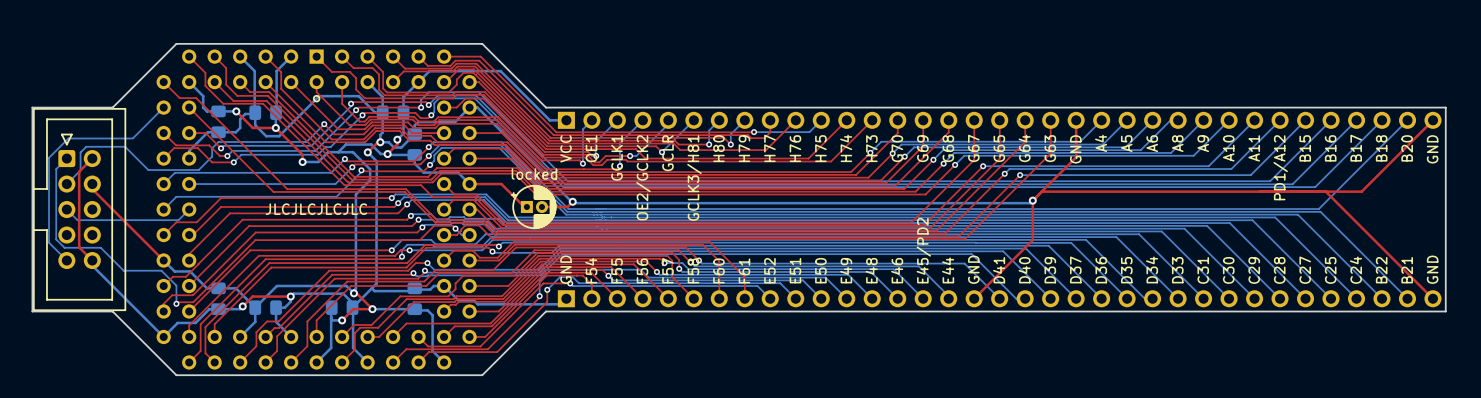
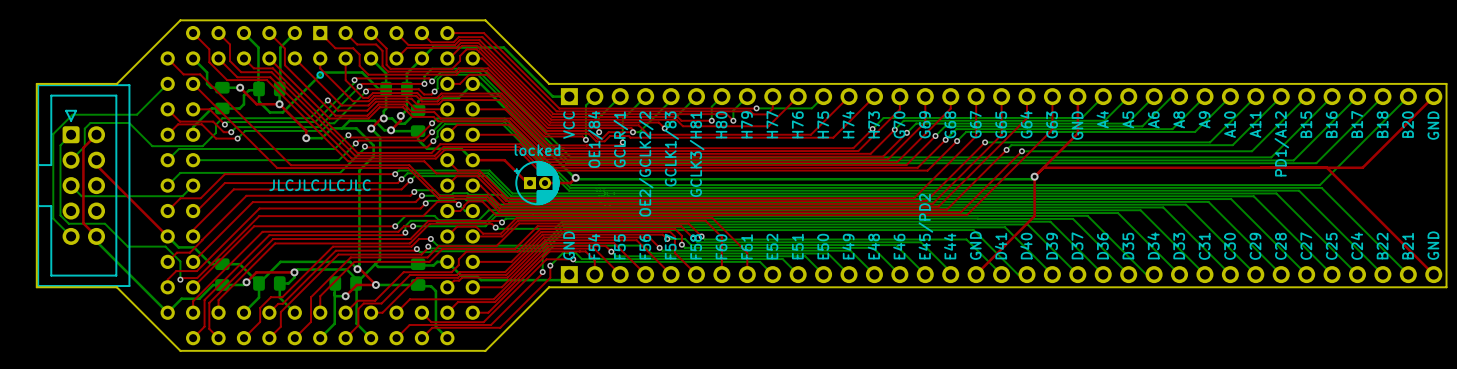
text: OE1 (591, 148) -> OE1/84 (595, 139)
top track: (588, 151) (592, 156) (595, 156) -> (591, 128) (631, 128) (635, 132)
text: GCLR (667, 153) -> GCLK1/83 (671, 148)
text: GCLK1 (617, 157) -> GCLR/1 (620, 139)
text: OE2/GCLK2 (643, 177) -> OE2/GCLK2/2 (646, 163)

